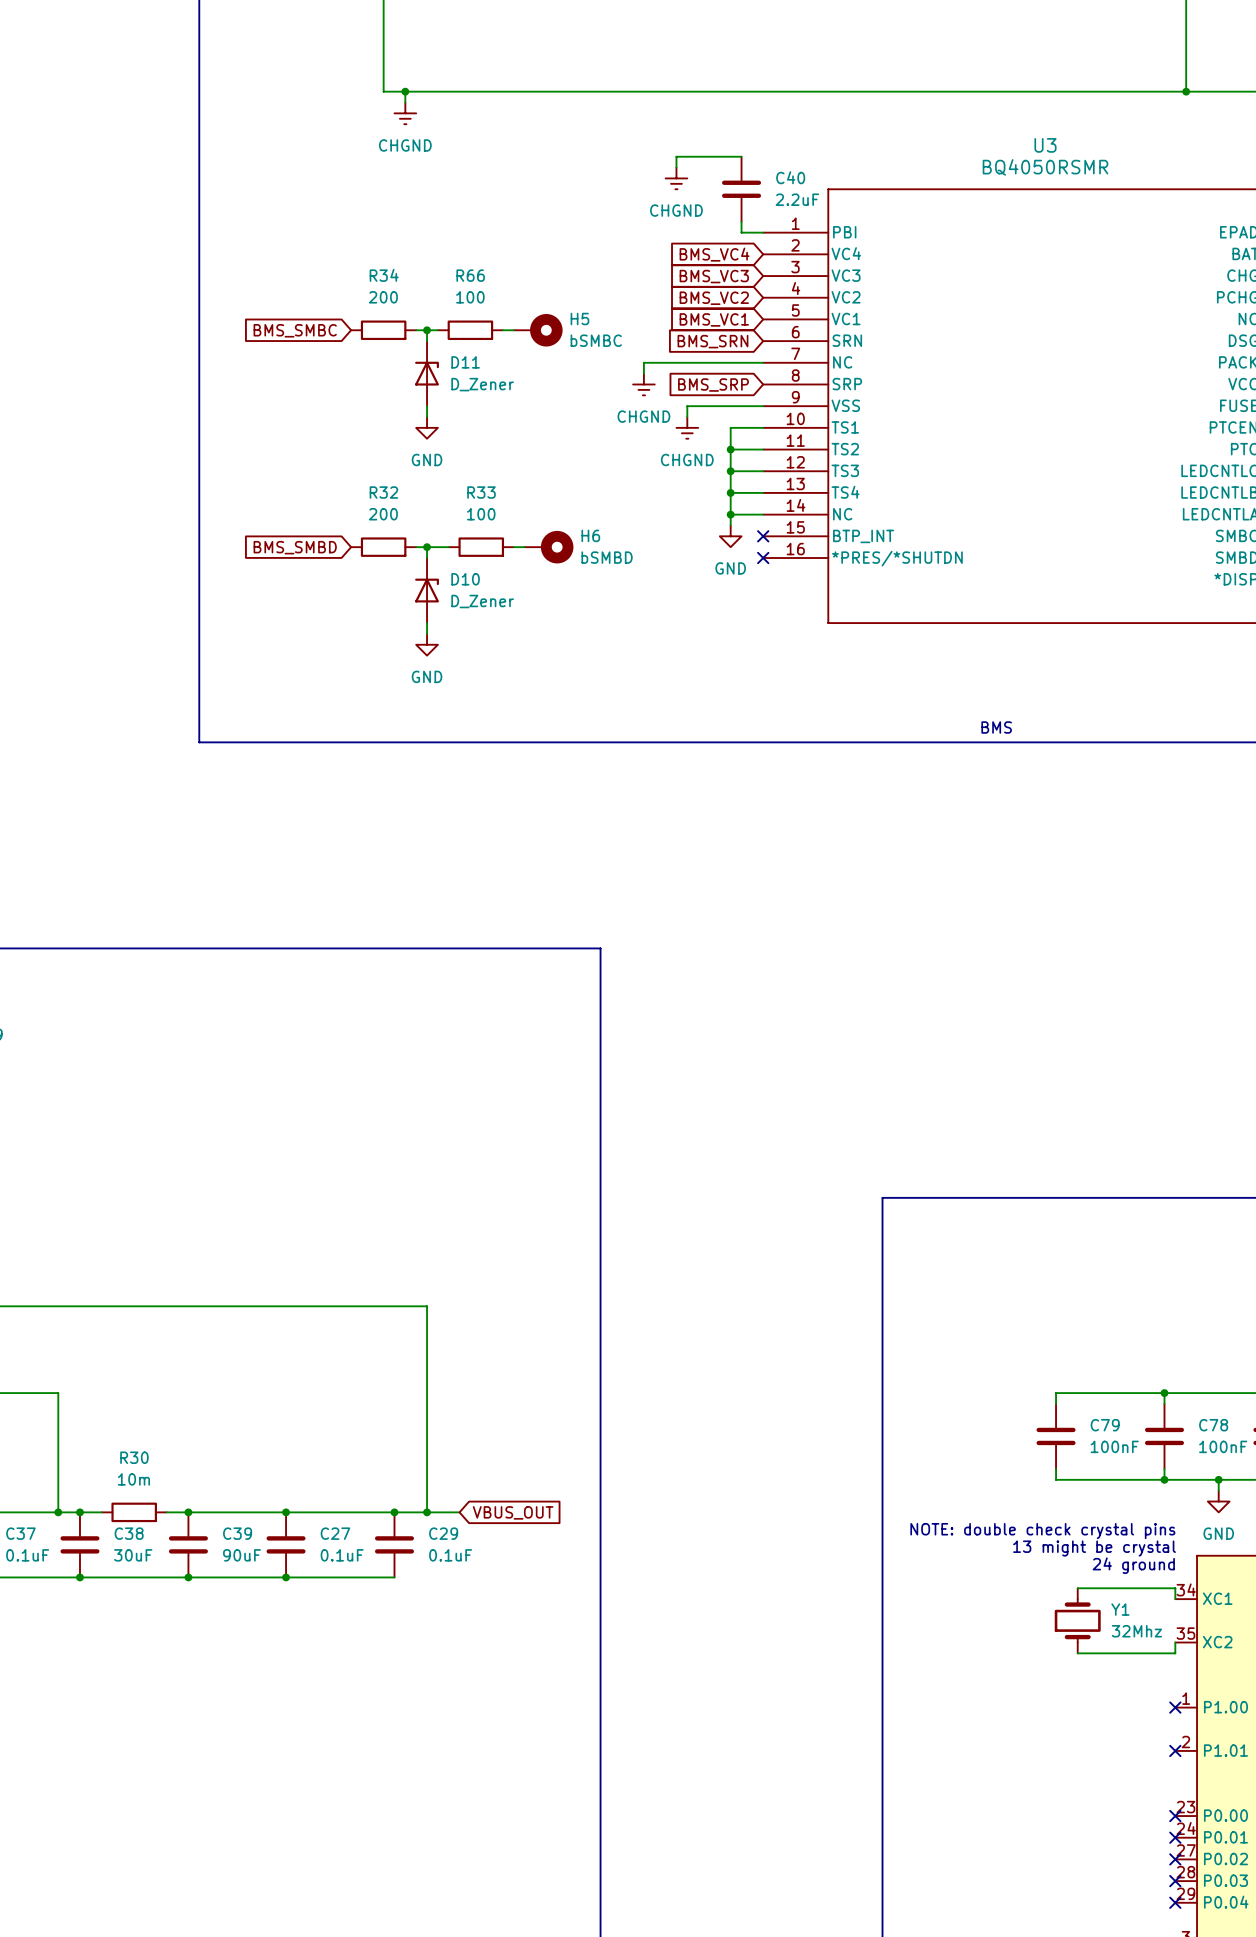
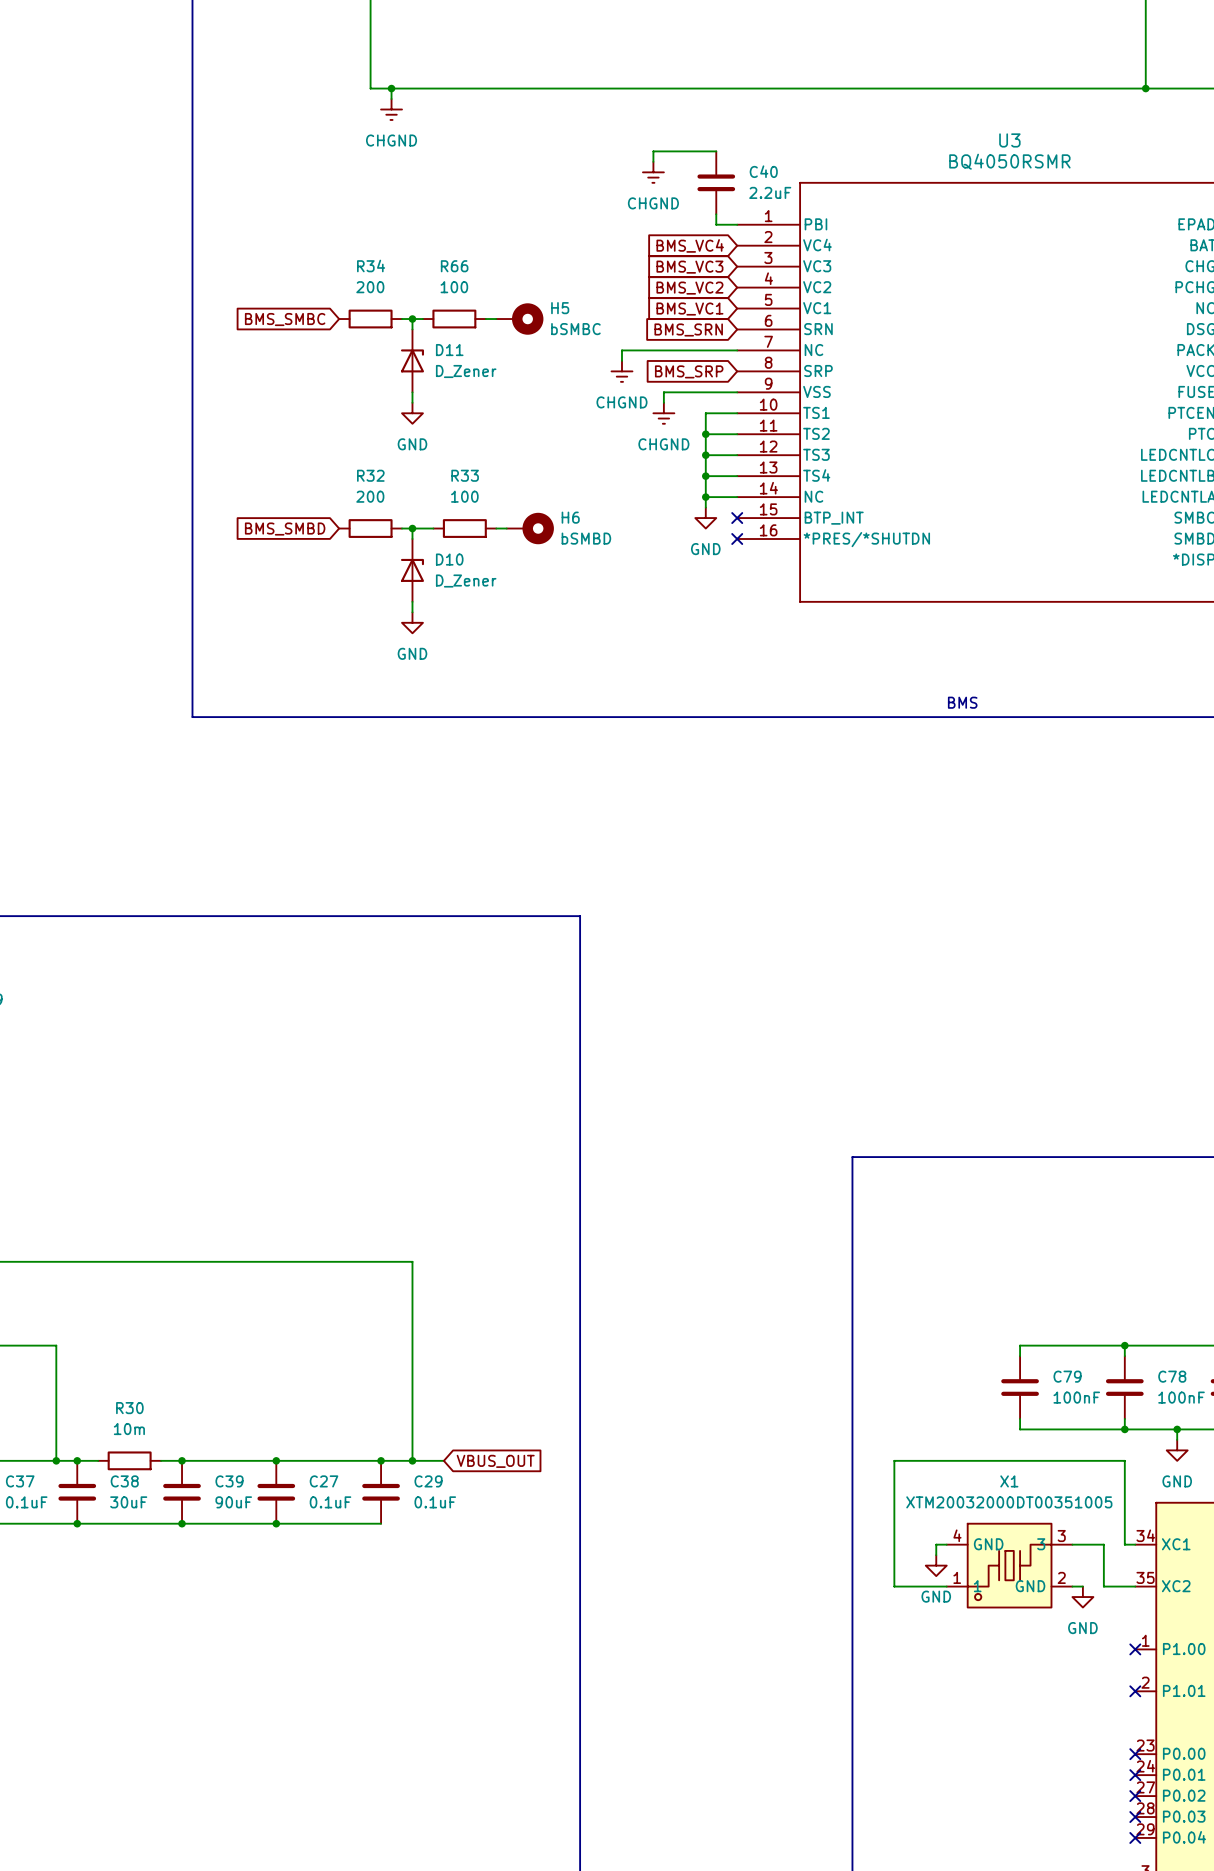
text: NOTE: double check crystal pins (1042, 1531) -> none
text: 13 might be crystal (1094, 1548) -> none
text: 24 ground (1133, 1565) -> none
wire: (1077, 1588) (1175, 1588) (1175, 1599) -> (946, 1586) (894, 1586) (894, 1460) (1124, 1460) (1124, 1544) (1135, 1544)
wire: none -> (946, 1544) (936, 1544) (936, 1555)
power symbol: none -> GND (936, 1565)
X1: none -> XTM20032000DT00351005 (1009, 1565)
Y1: 32Mhz (1077, 1620) -> none
wire: none -> (1072, 1586) (1082, 1586)
wire: (1175, 1642) (1175, 1653) (1077, 1653) -> (1135, 1586) (1103, 1586) (1103, 1544) (1072, 1544)
power symbol: none -> GND (1082, 1597)

